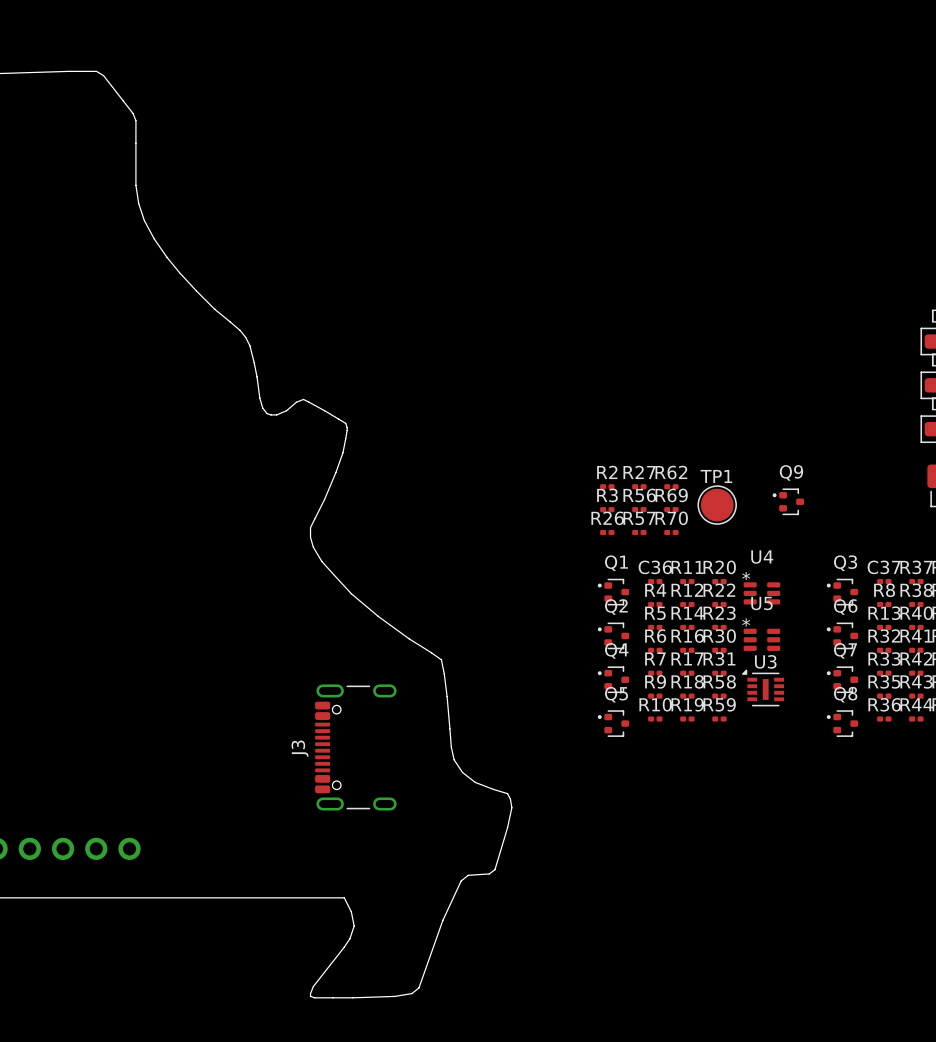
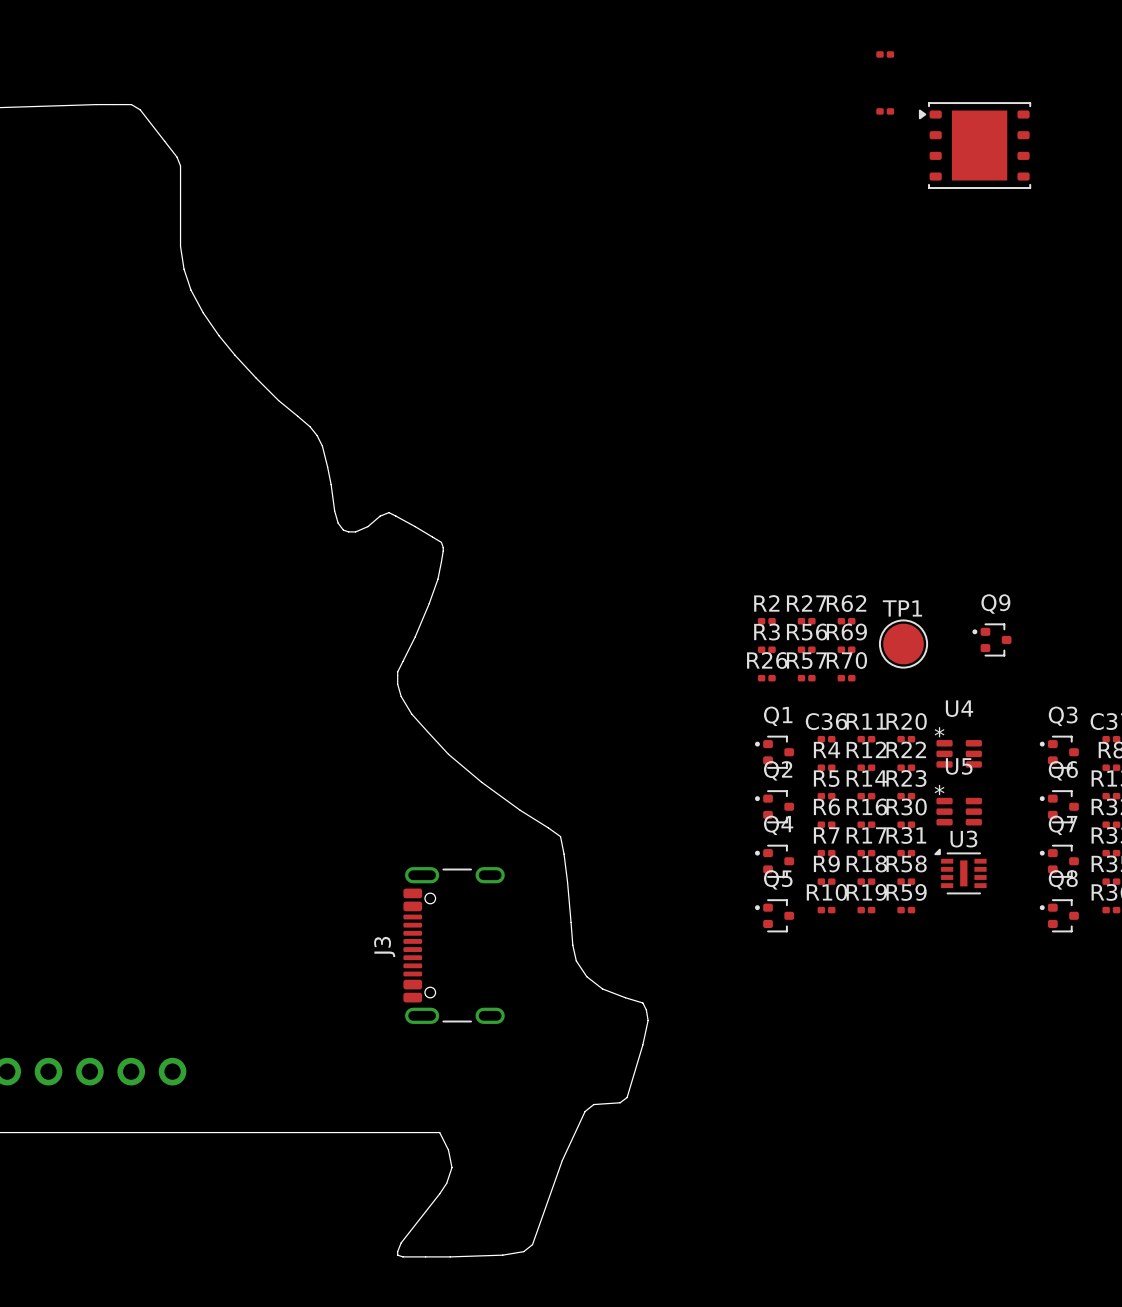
part: none -> (885, 54)
part: none -> (885, 111)
part: none -> (975, 145)

